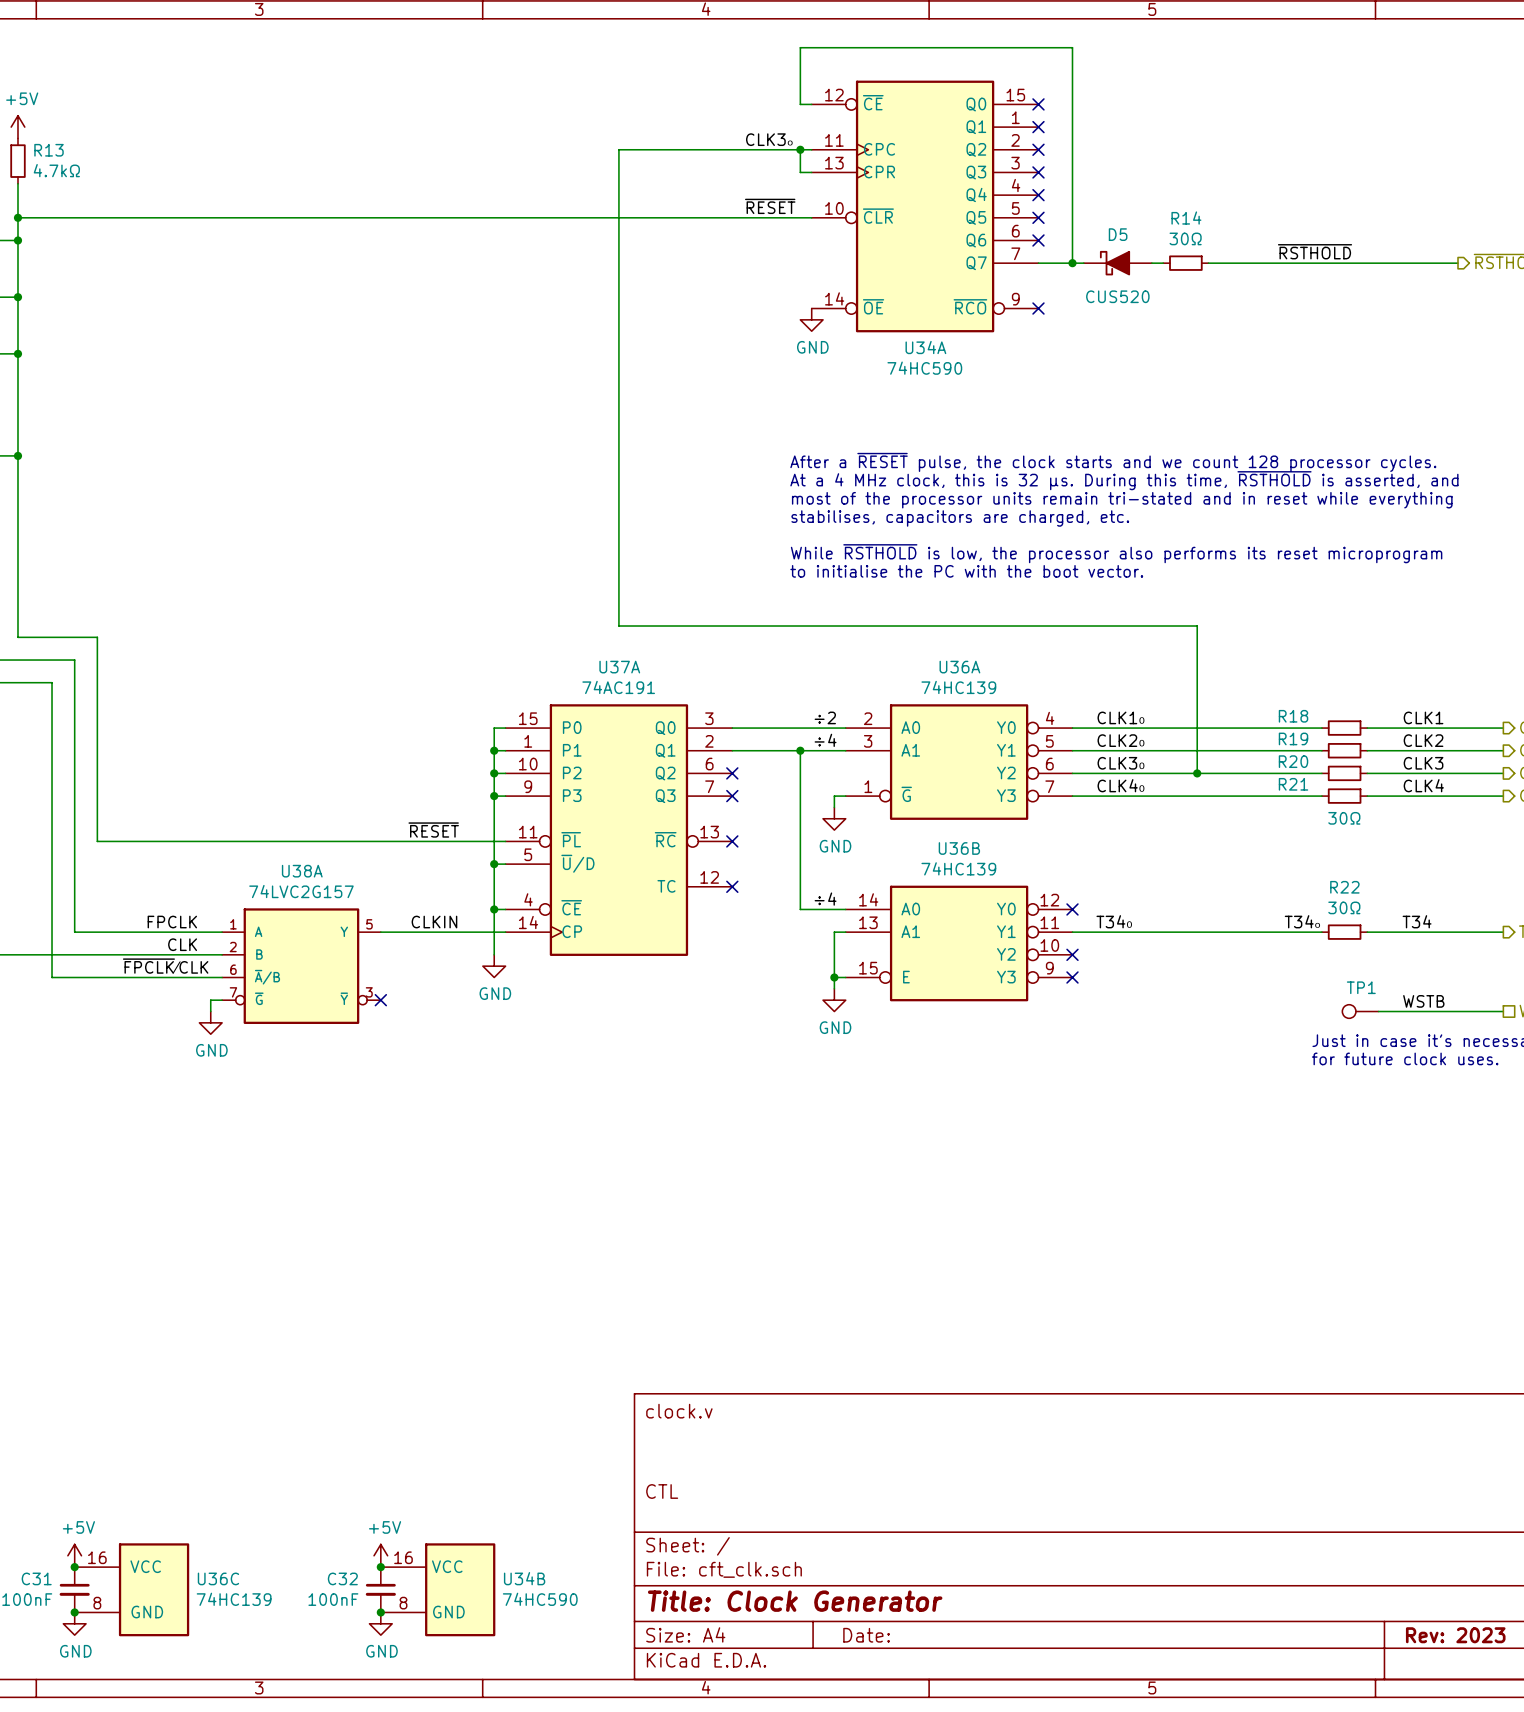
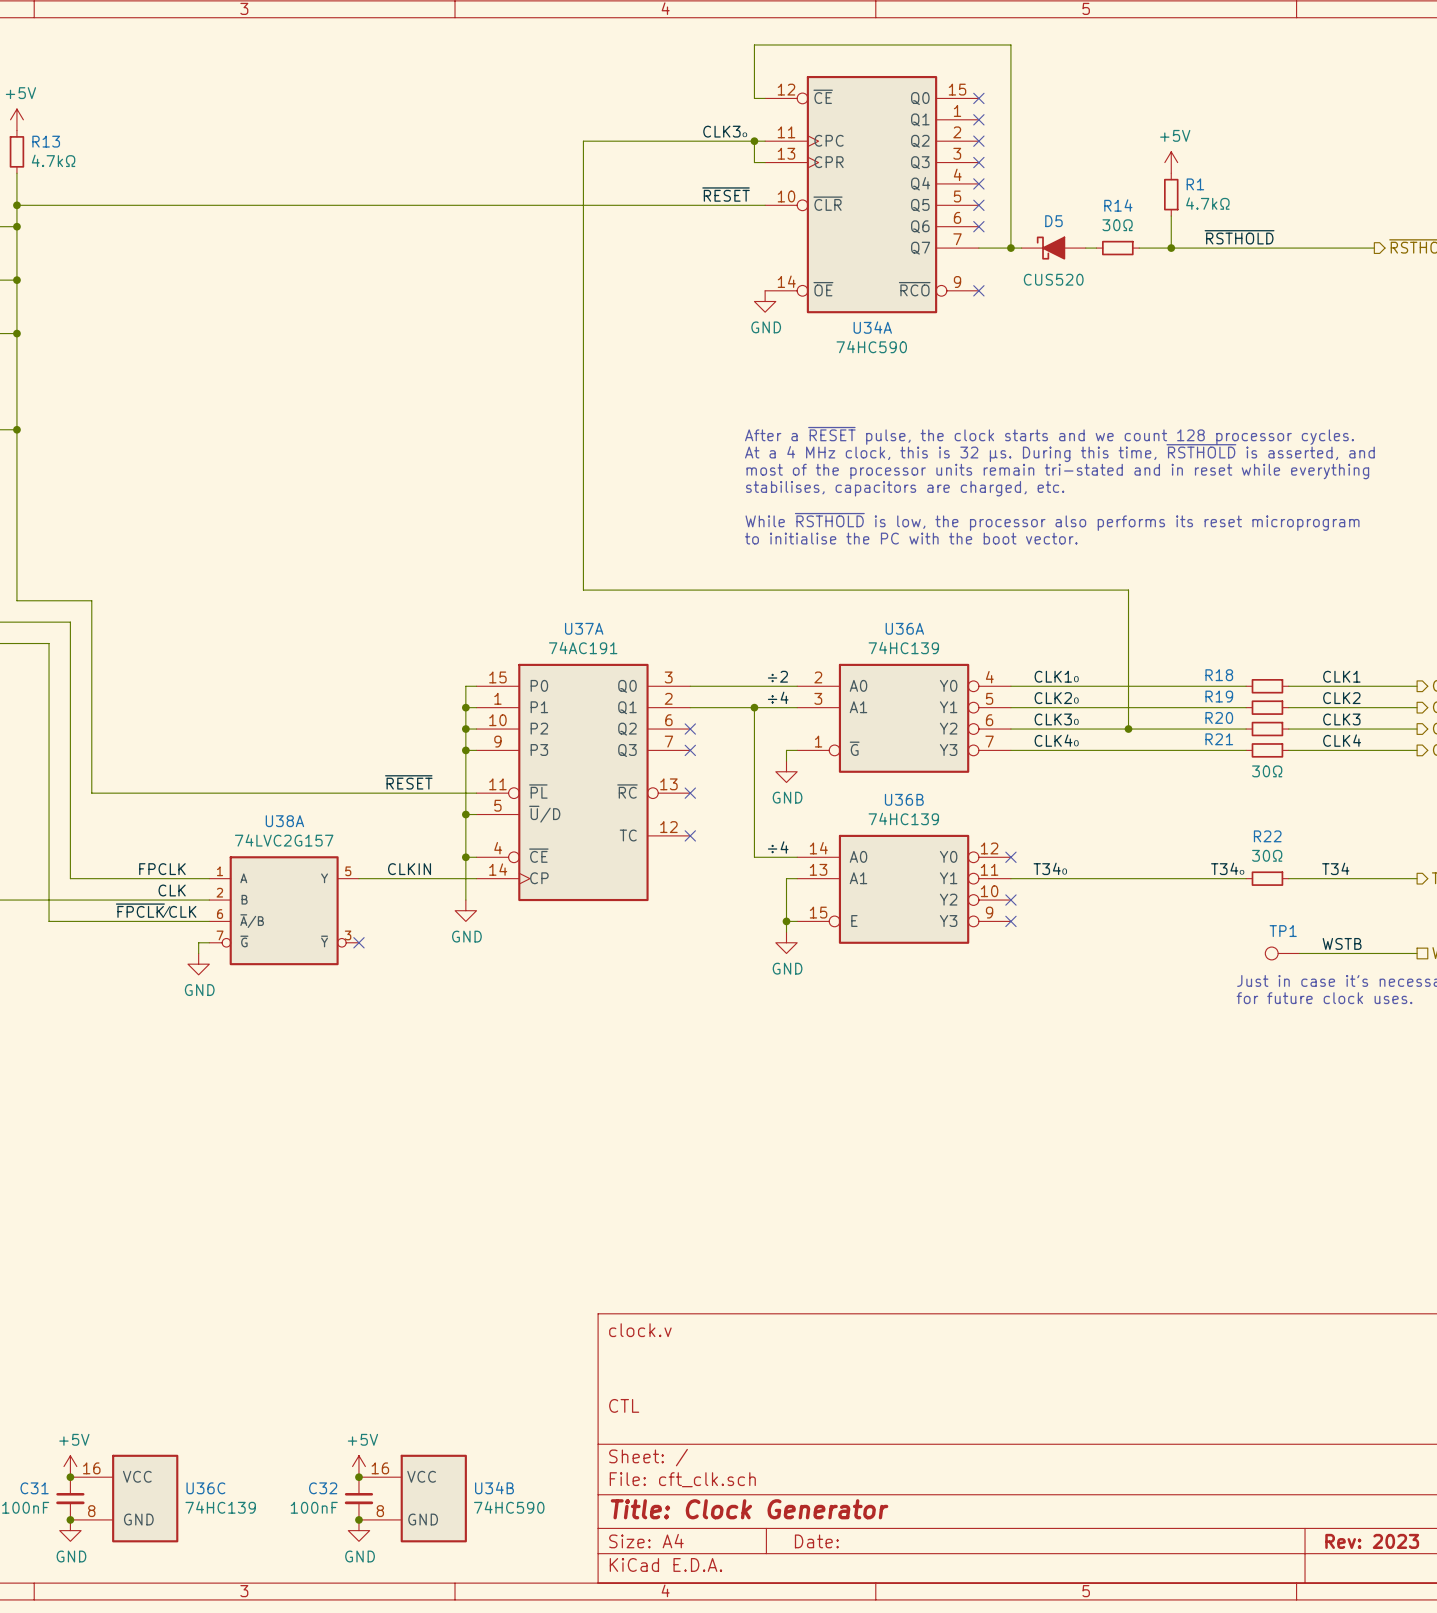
power symbol: none -> +5V (1171, 162)
R1: none -> 4.7kΩ (1171, 194)
wire: none -> (1171, 216) (1171, 248)
junction: none -> (1171, 248)

